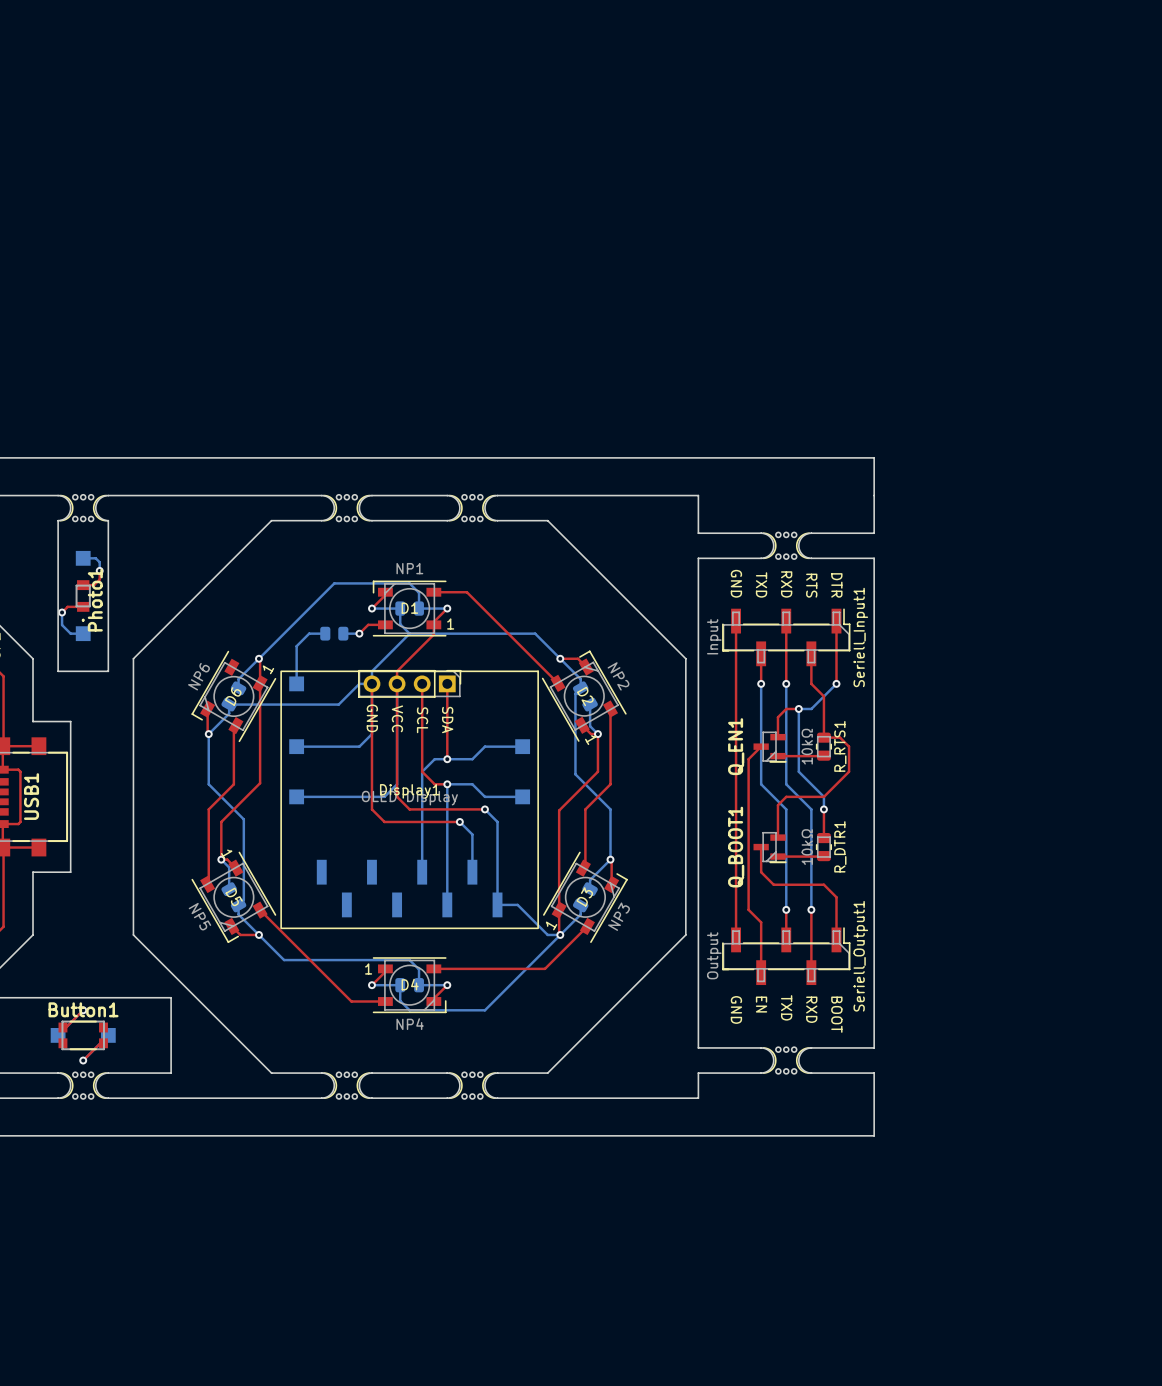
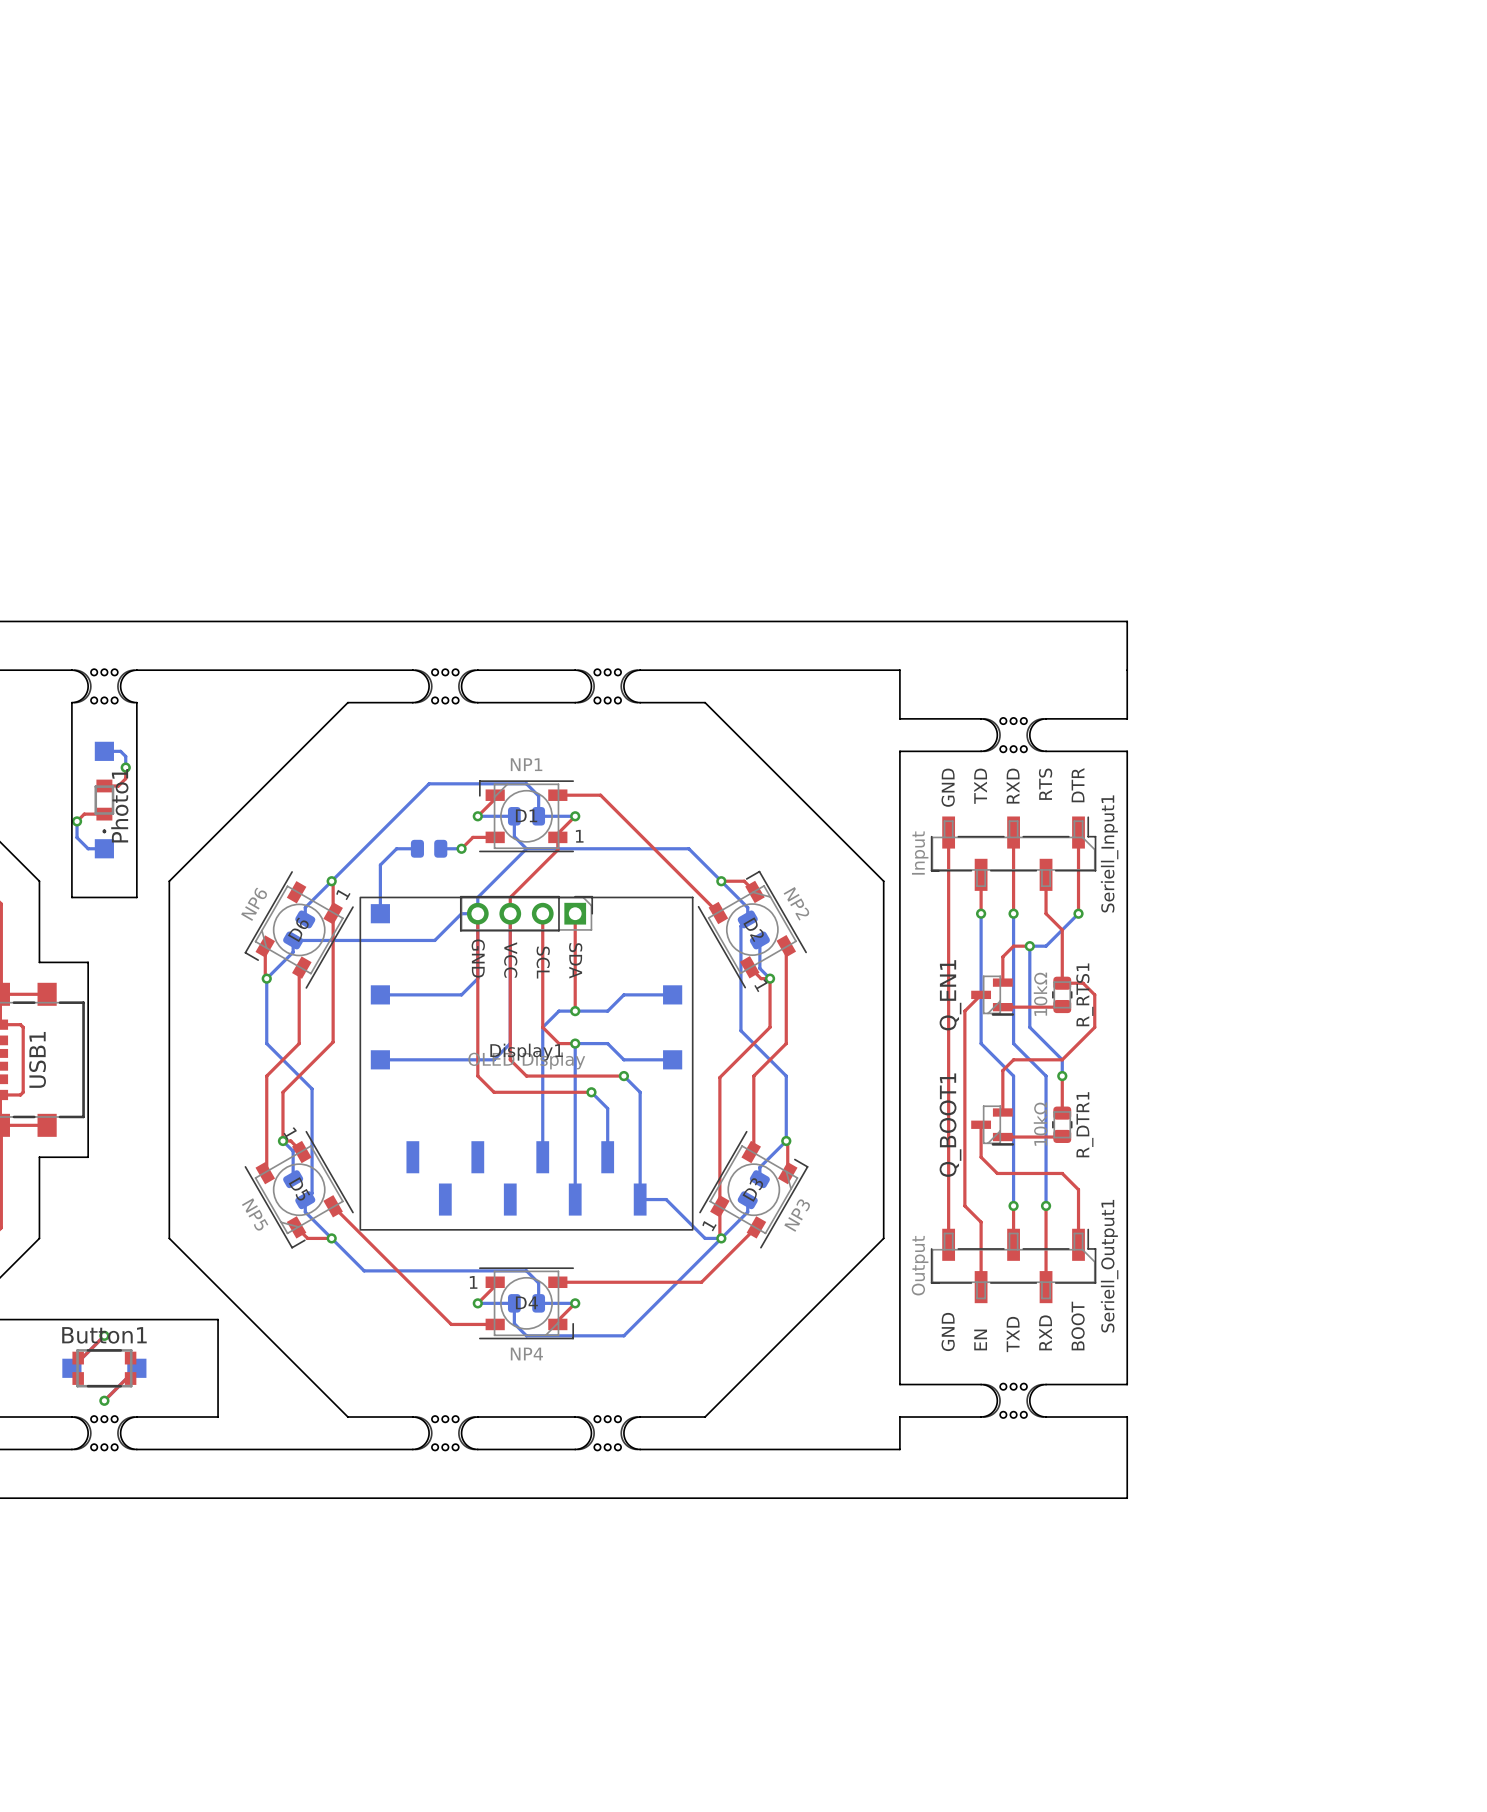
Seriell_Input1 text rotation: 0° (736, 583) -> 180° (948, 787)
Seriell_Input1 text rotation: 0° (761, 584) -> 180° (980, 786)
Seriell_Input1 text rotation: 0° (786, 584) -> 180° (1013, 786)
Seriell_Input1 text rotation: 0° (811, 585) -> 180° (1045, 784)
Seriell_Input1 text rotation: 0° (836, 585) -> 180° (1078, 785)
Seriell_Output1 text rotation: 0° (761, 1004) -> 180° (980, 1339)
Seriell_Output1 text rotation: 0° (786, 1007) -> 180° (1013, 1334)
Seriell_Output1 text rotation: 0° (736, 1009) -> 180° (948, 1331)
Seriell_Output1 text rotation: 0° (811, 1009) -> 180° (1045, 1332)
Seriell_Output1 text rotation: 0° (836, 1014) -> 180° (1078, 1326)

